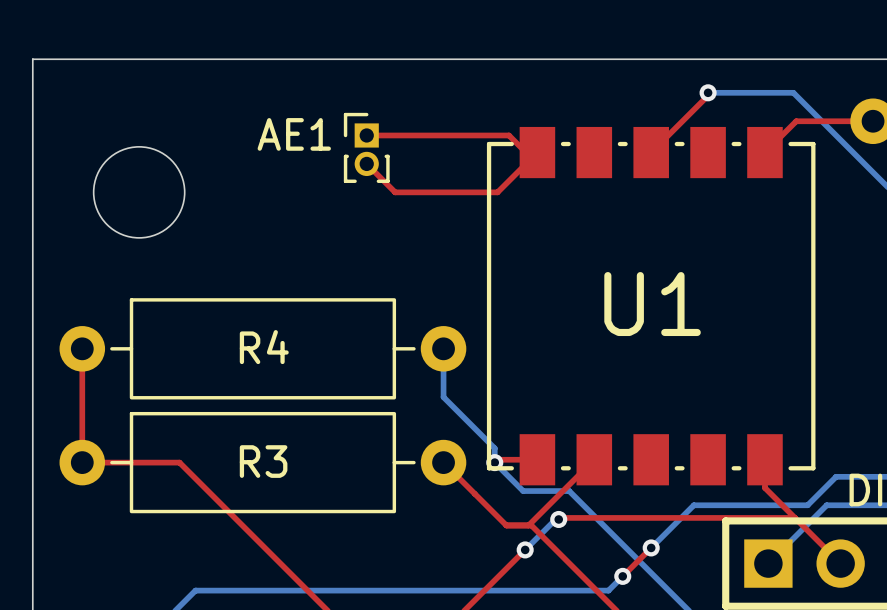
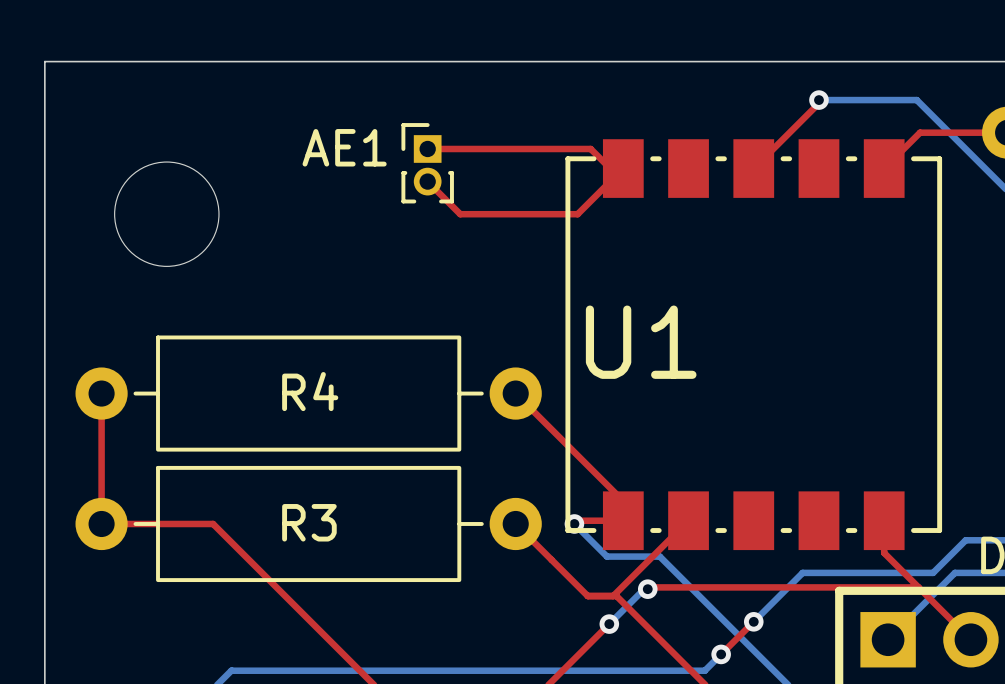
U1 name position: U1 (652, 304) -> U1 (641, 342)
top track: none -> (515, 393) (623, 501)
bottom track: (443, 348) (443, 397) (494, 448) (494, 462) -> none

